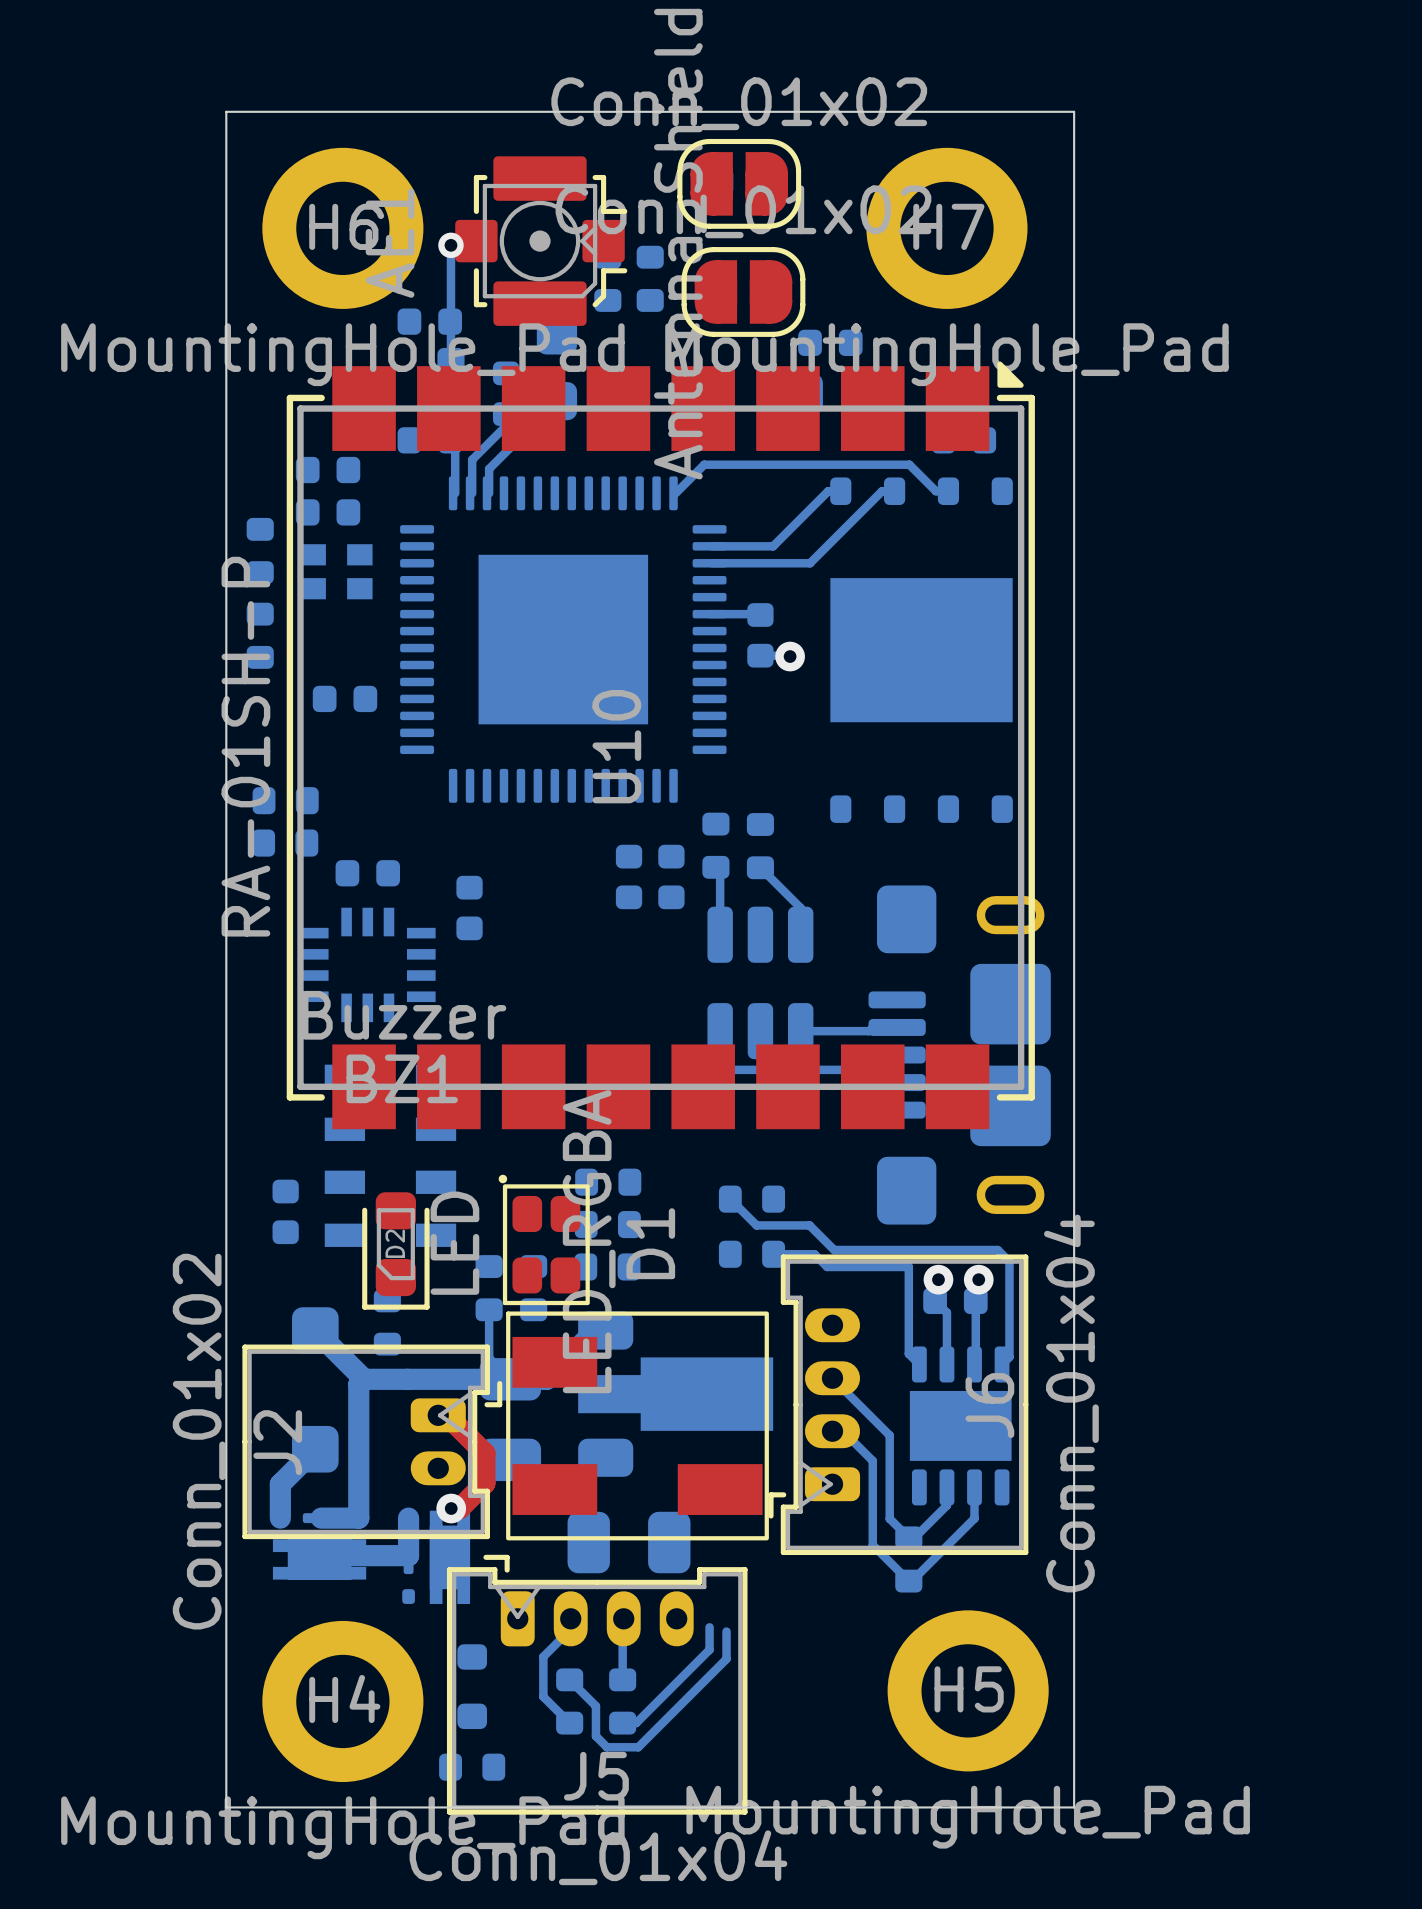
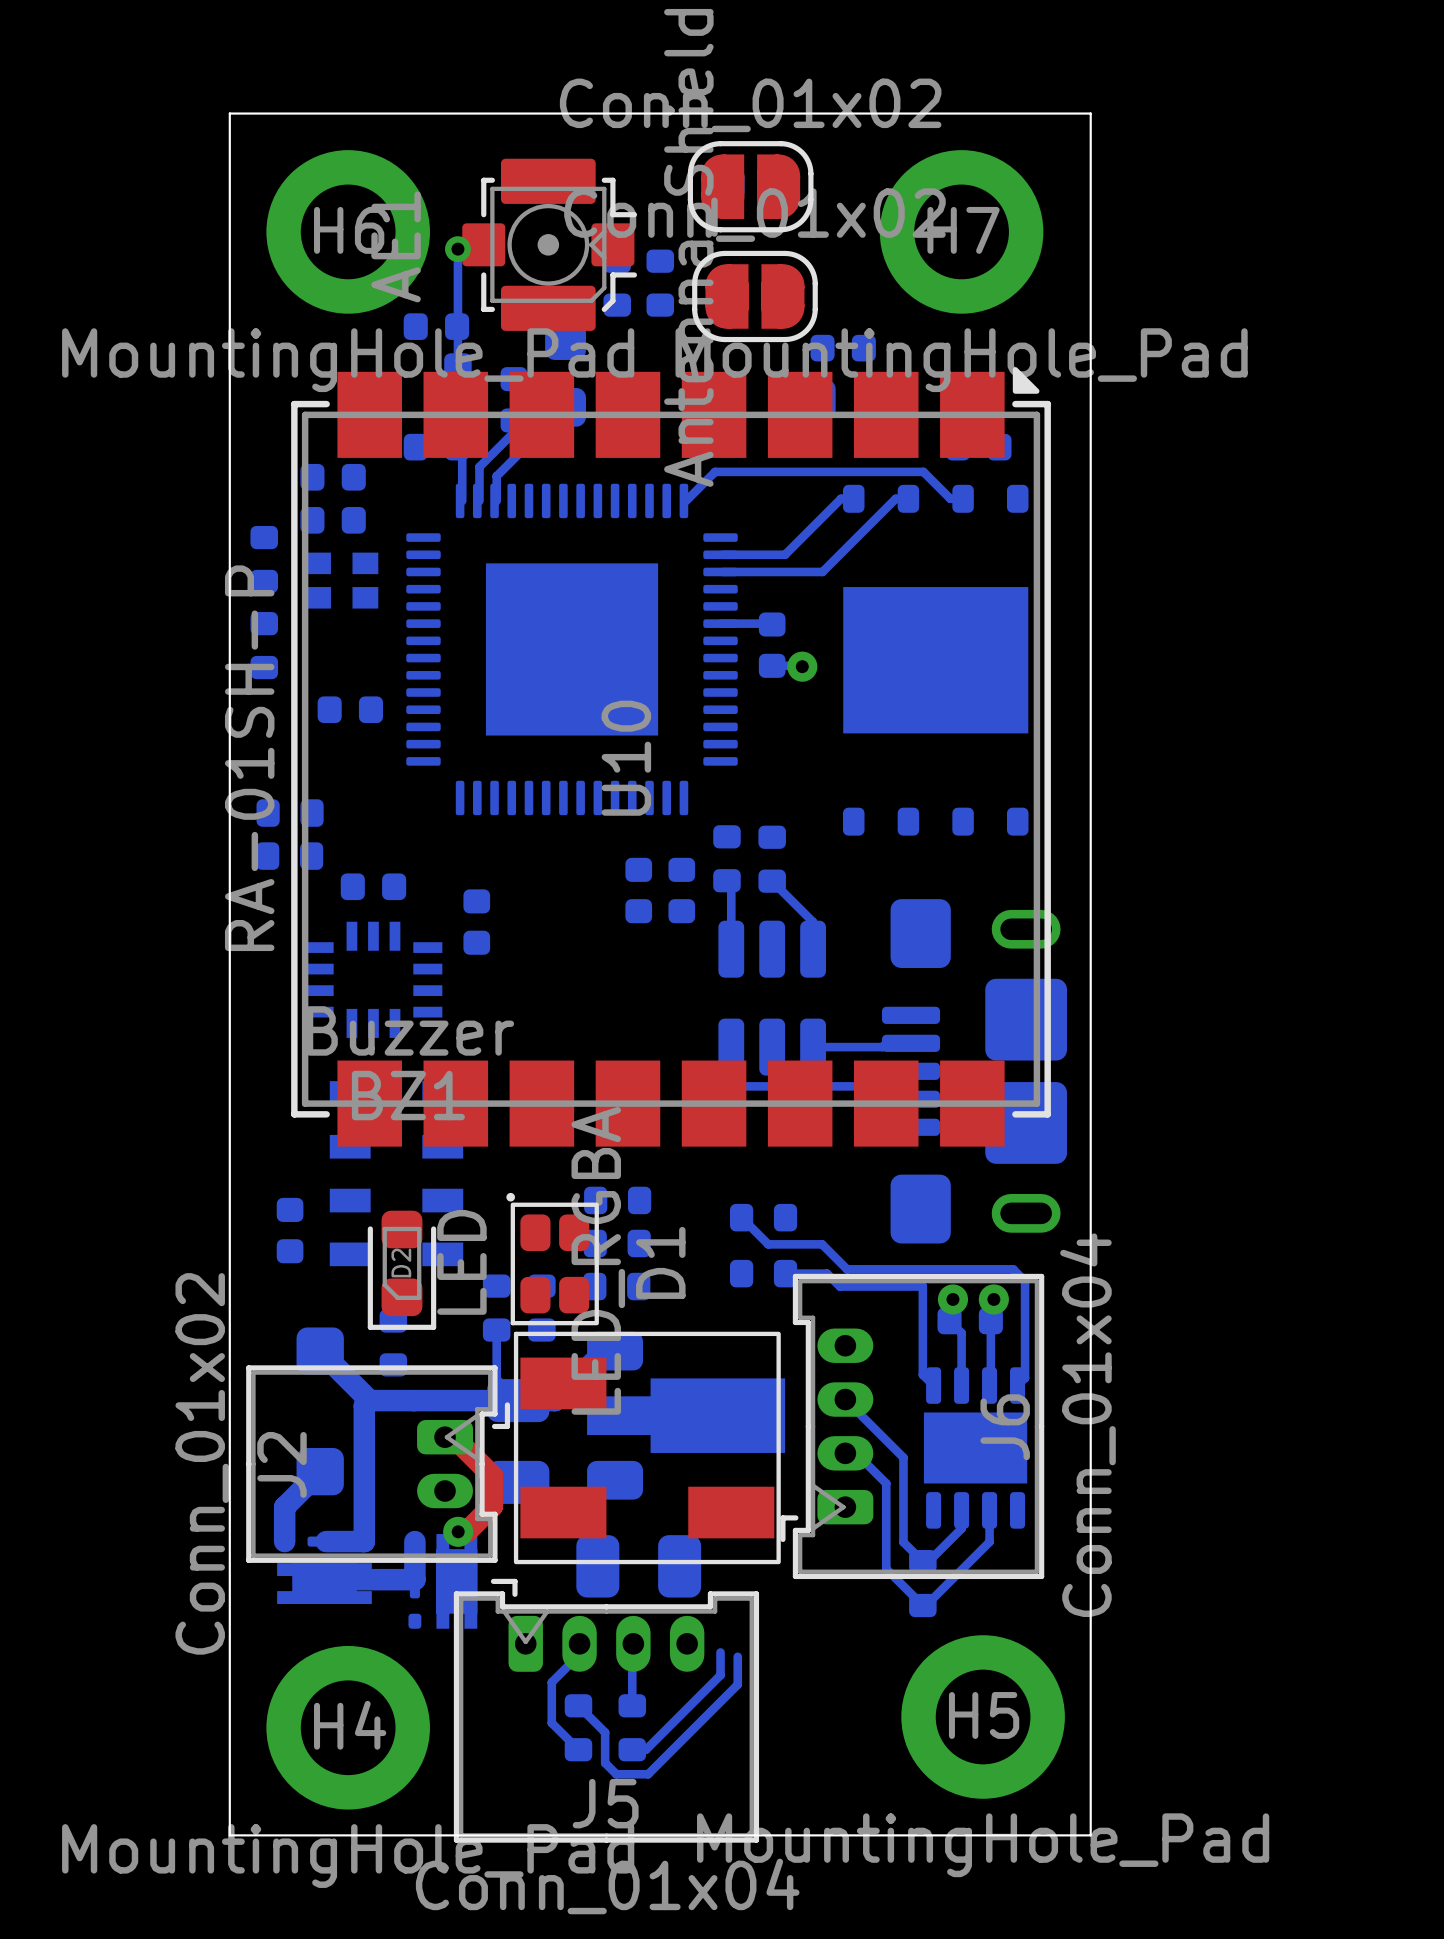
part: (472, 1686) -> none
part: (472, 1767) -> none

